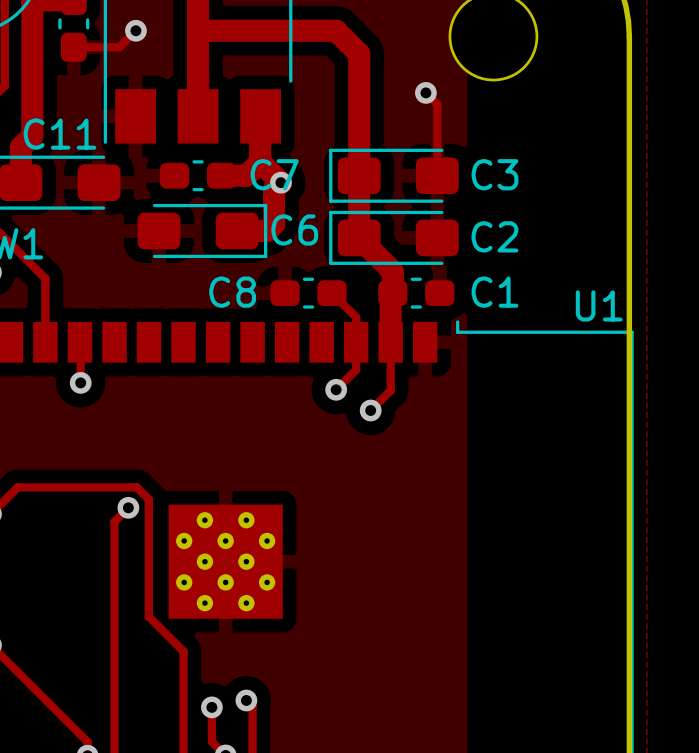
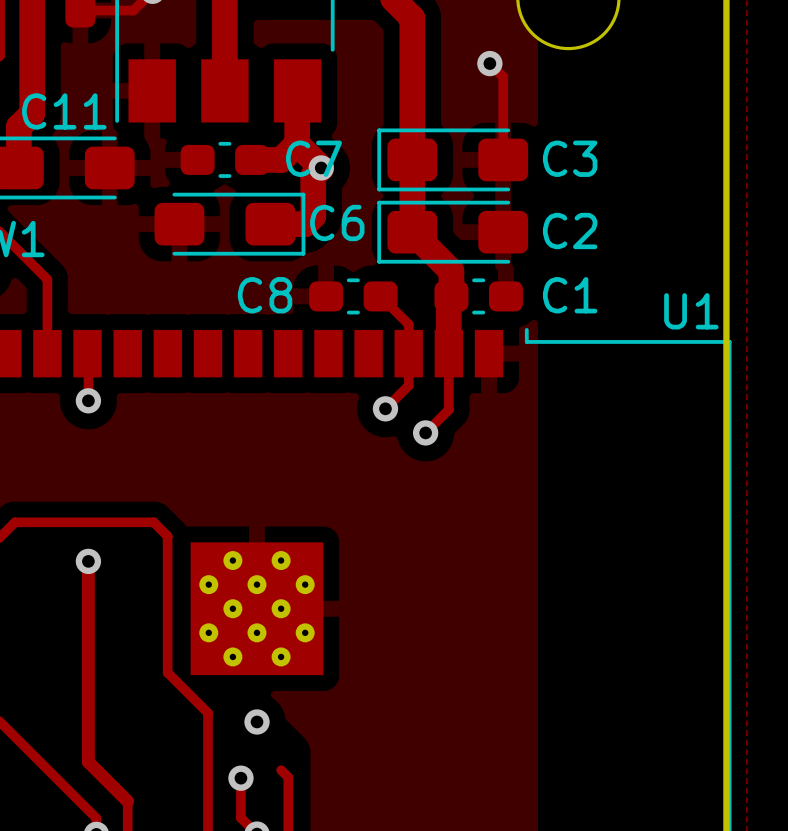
track: (128, 507) (114, 521) (114, 727) -> (88, 561) (88, 762) (127, 801)
via position: (128, 507) -> (88, 561)
via position: (246, 700) -> (257, 721)

